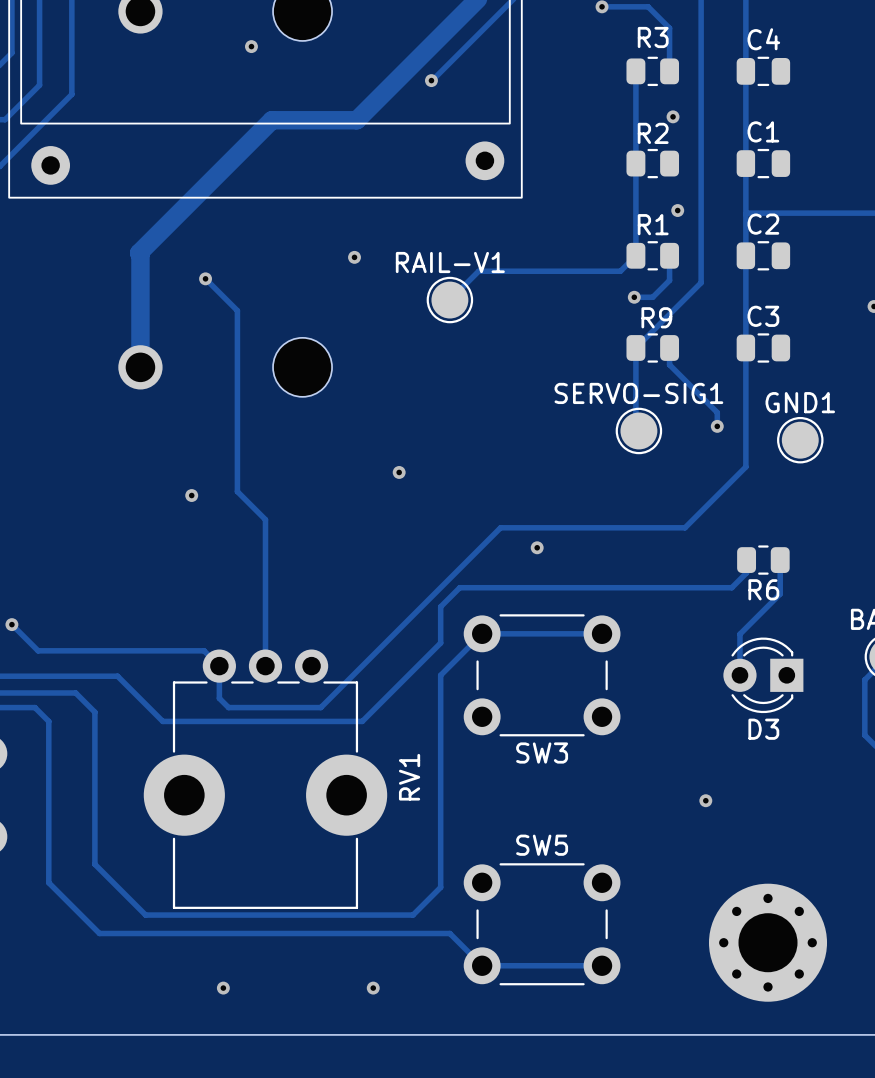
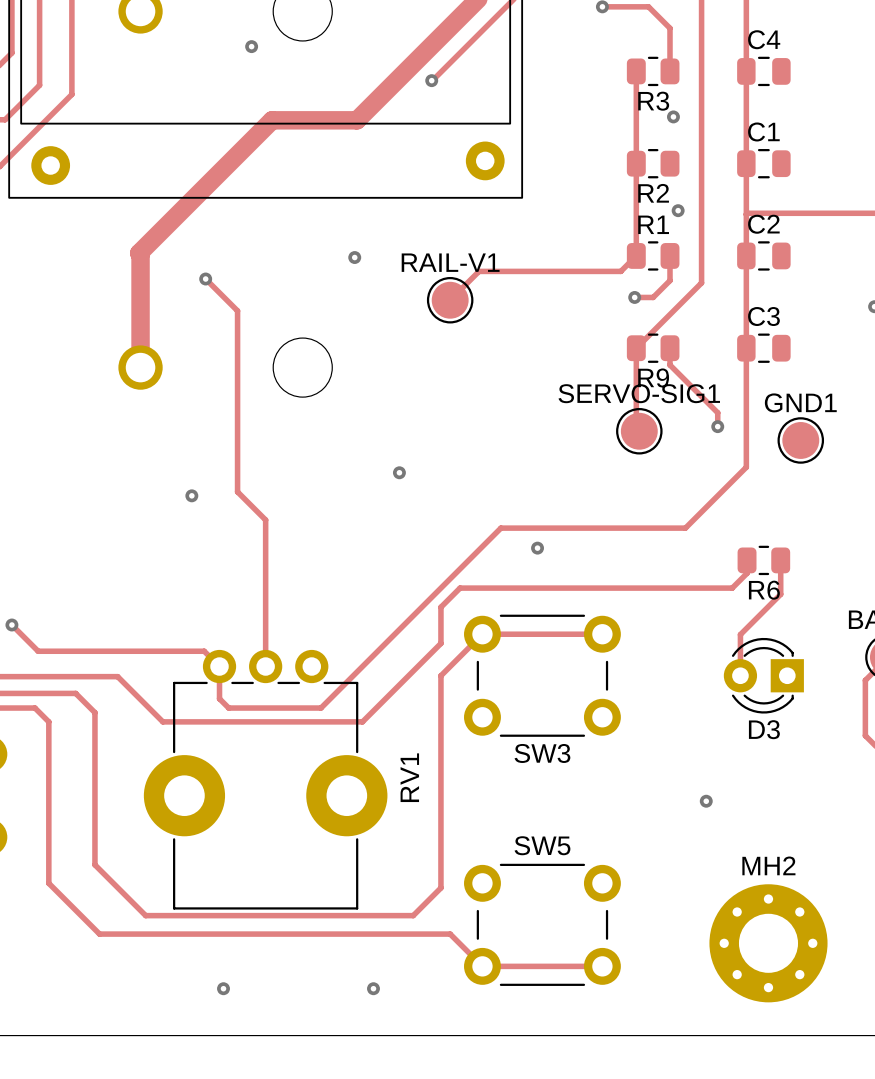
R3 name position: R3 (653, 37) -> R3 (653, 101)
R2 name position: R2 (653, 133) -> R2 (653, 193)
R9 name position: R9 (656, 317) -> R9 (653, 377)
MH2 name: none -> MH2 (768, 865)

